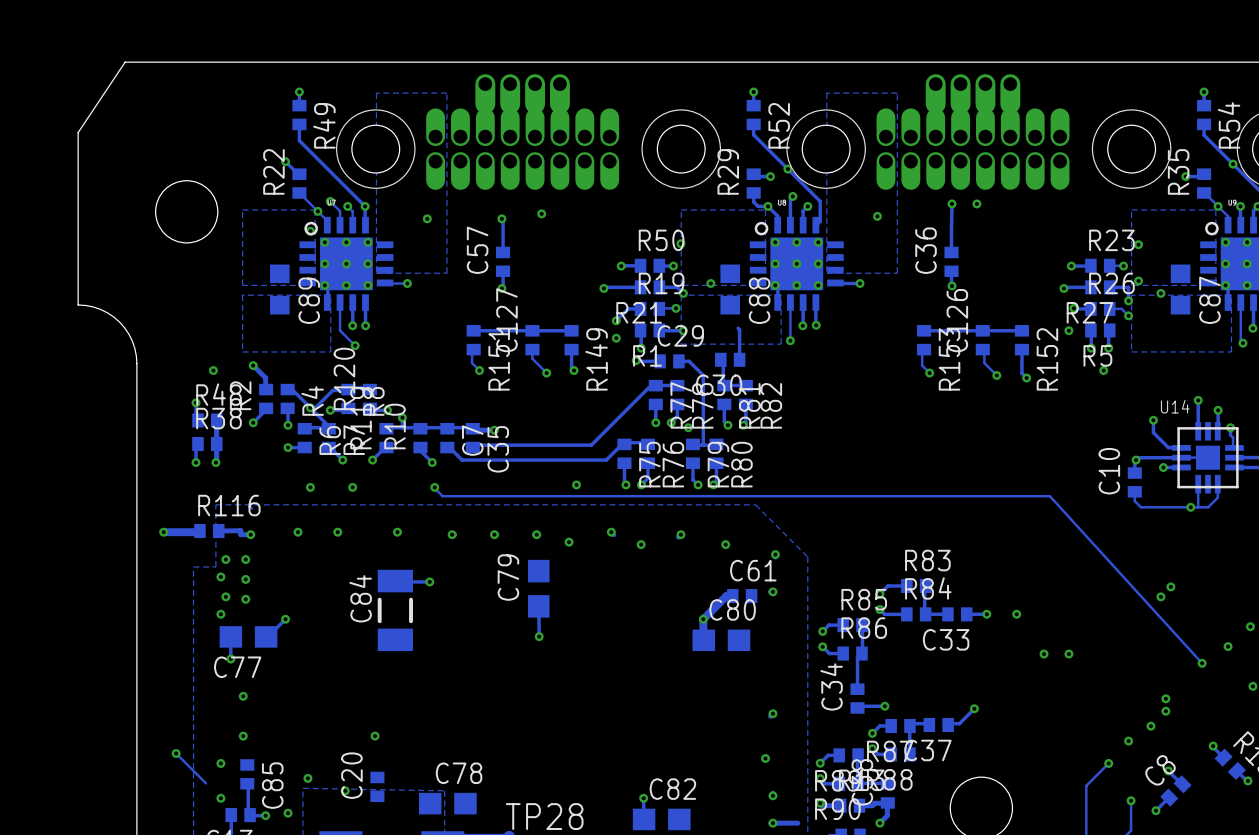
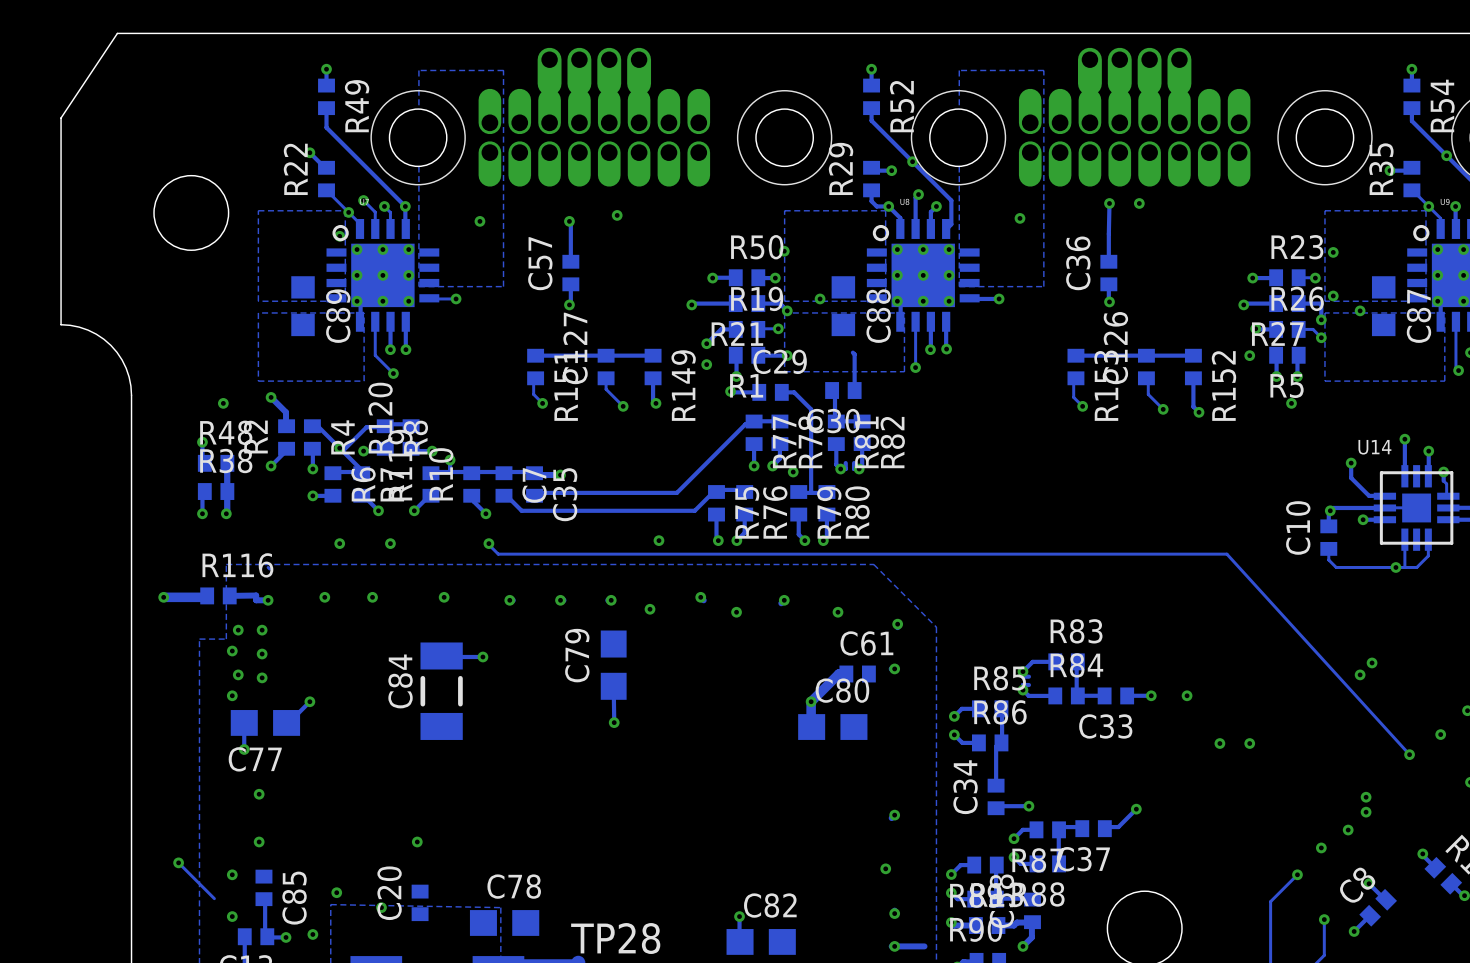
track: none -> (845, 463) (845, 469) (840, 469)
track: none -> (854, 463) (854, 469) (859, 469)
track: none -> (1022, 671) (1022, 676) (1028, 676)
track: none -> (1028, 685) (1022, 685) (1022, 690)

